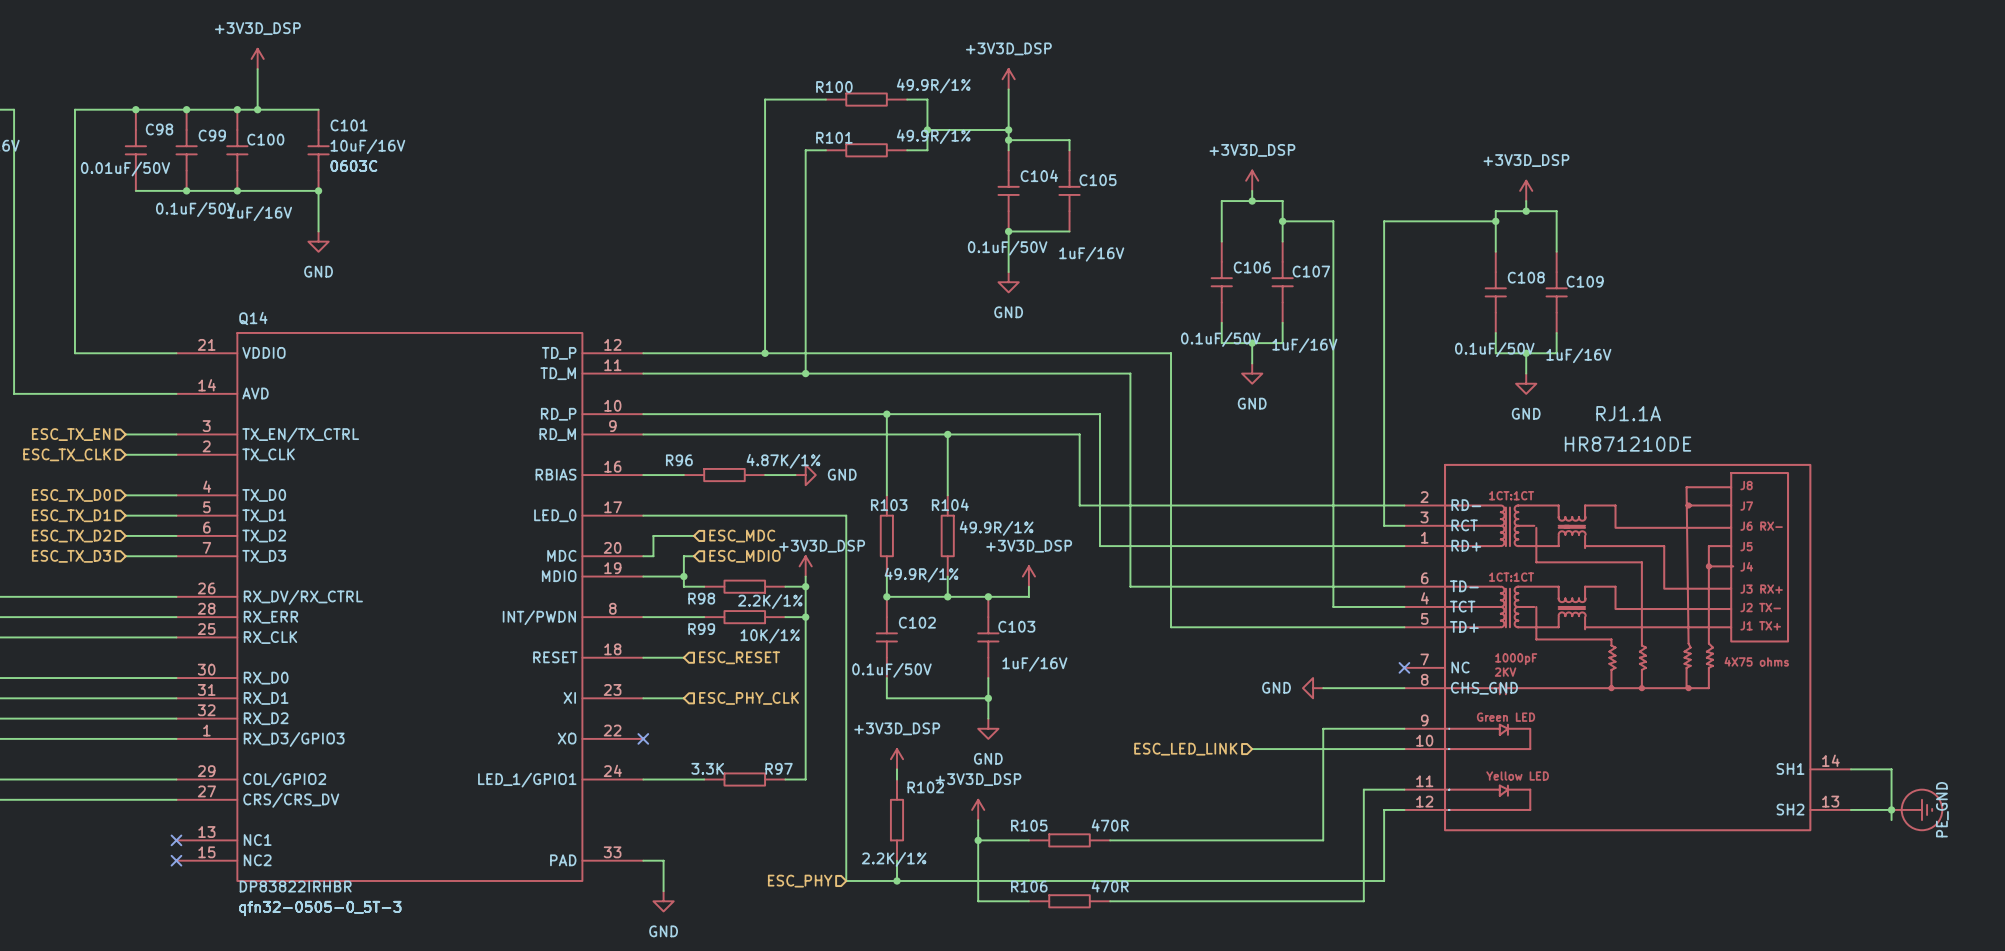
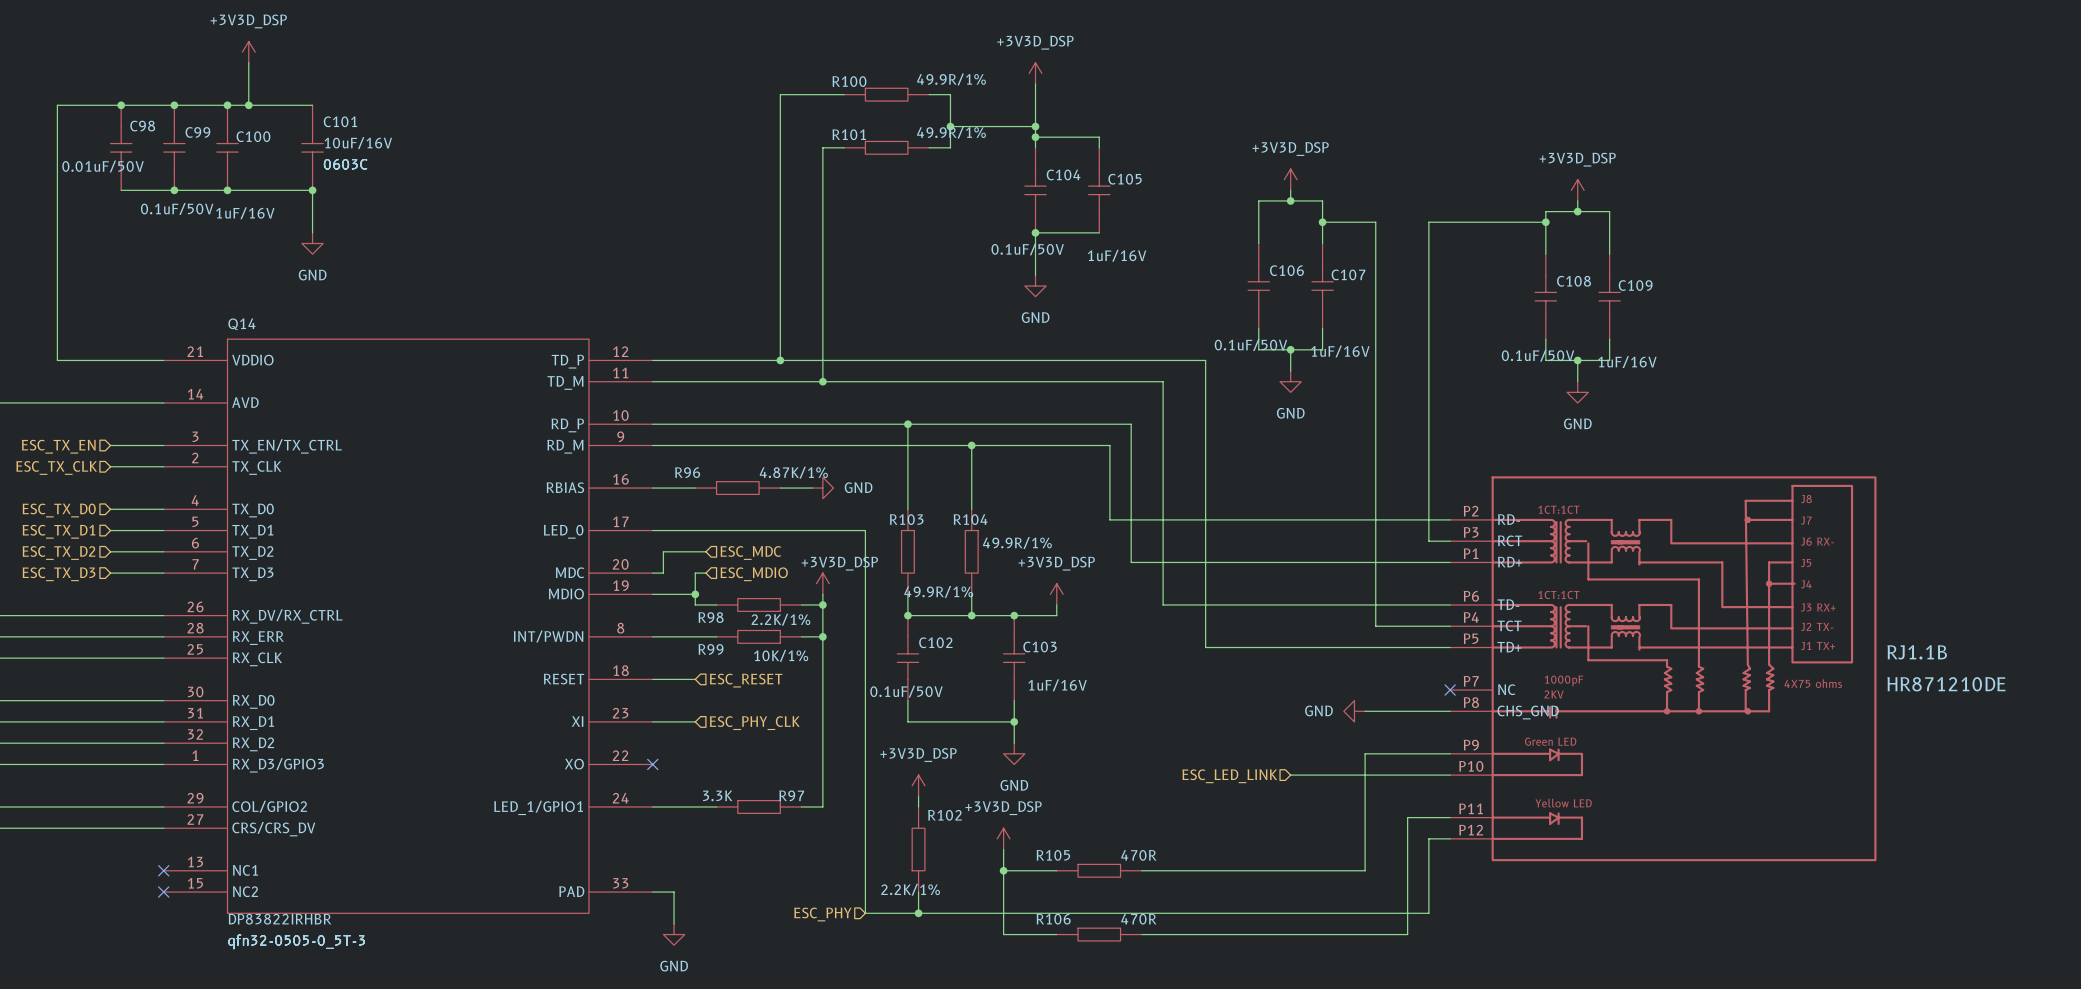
RJ1.1B: none -> HR871210DE (1663, 668)
RJ1.1A: HR871210DE (1627, 647) -> none
wire: (1850, 769) (1891, 769) (1891, 820) -> none
wire: (1850, 809) (1891, 809) -> none
junction: (1891, 809) -> none
power symbol: PE_GND (1916, 809) -> none

